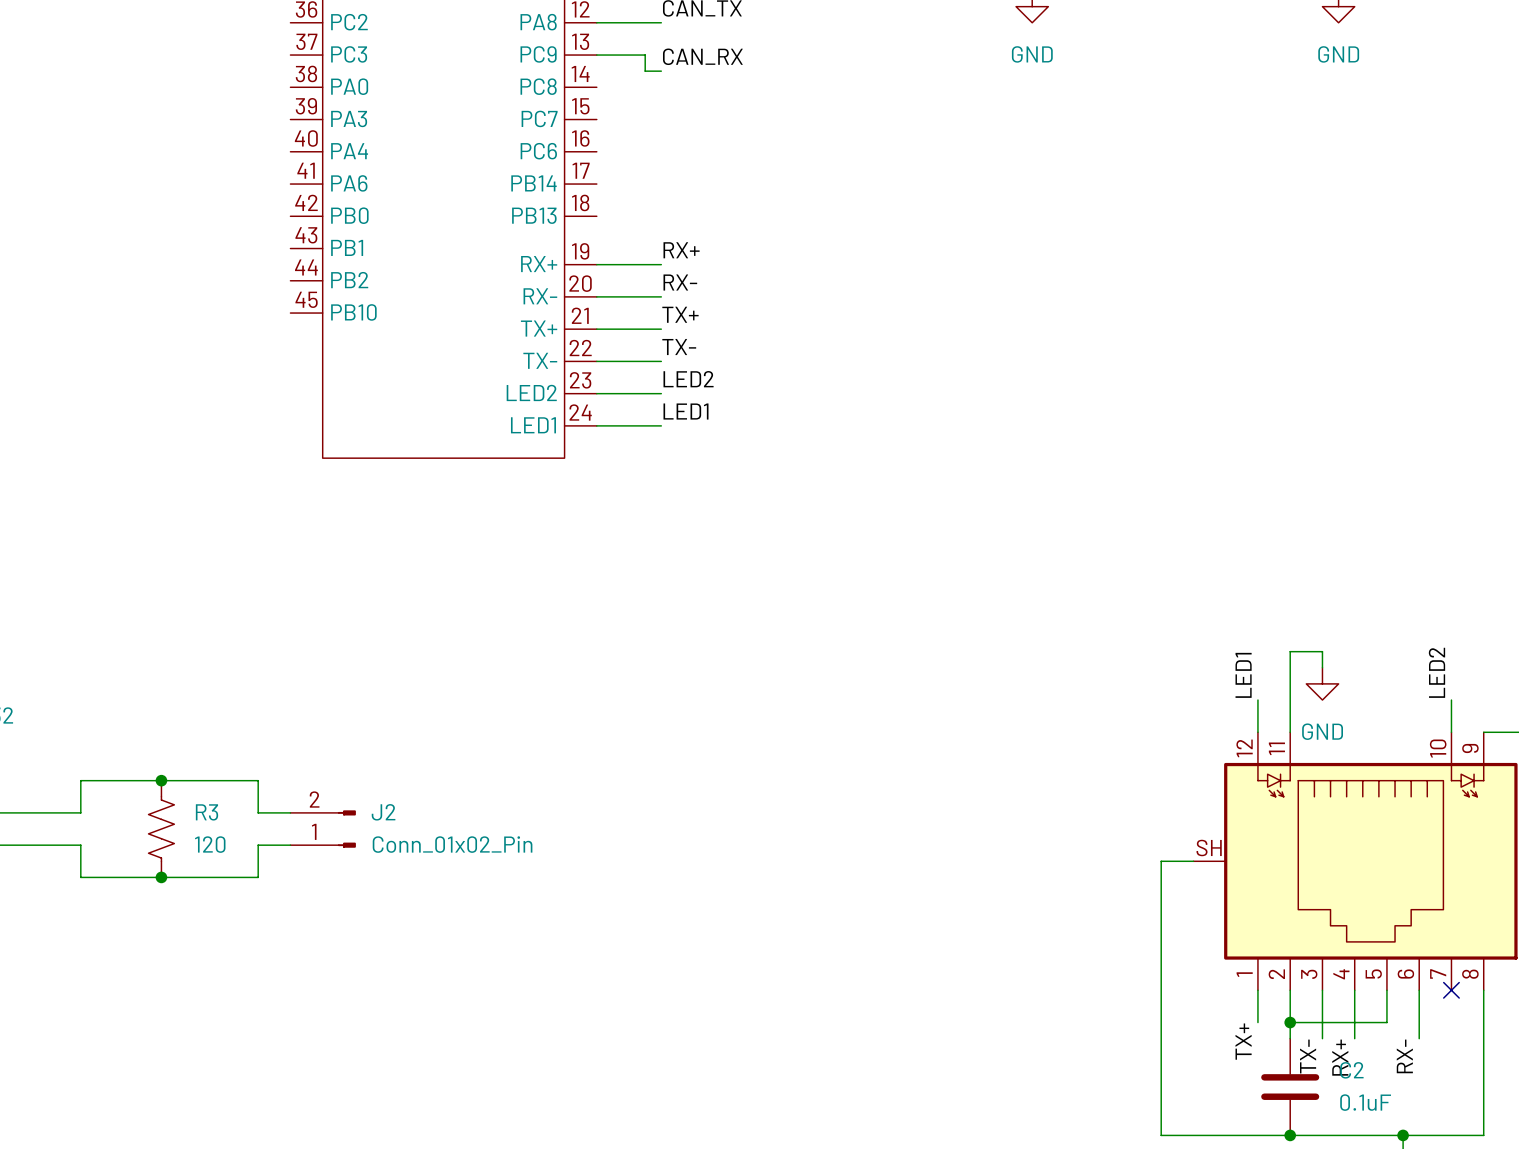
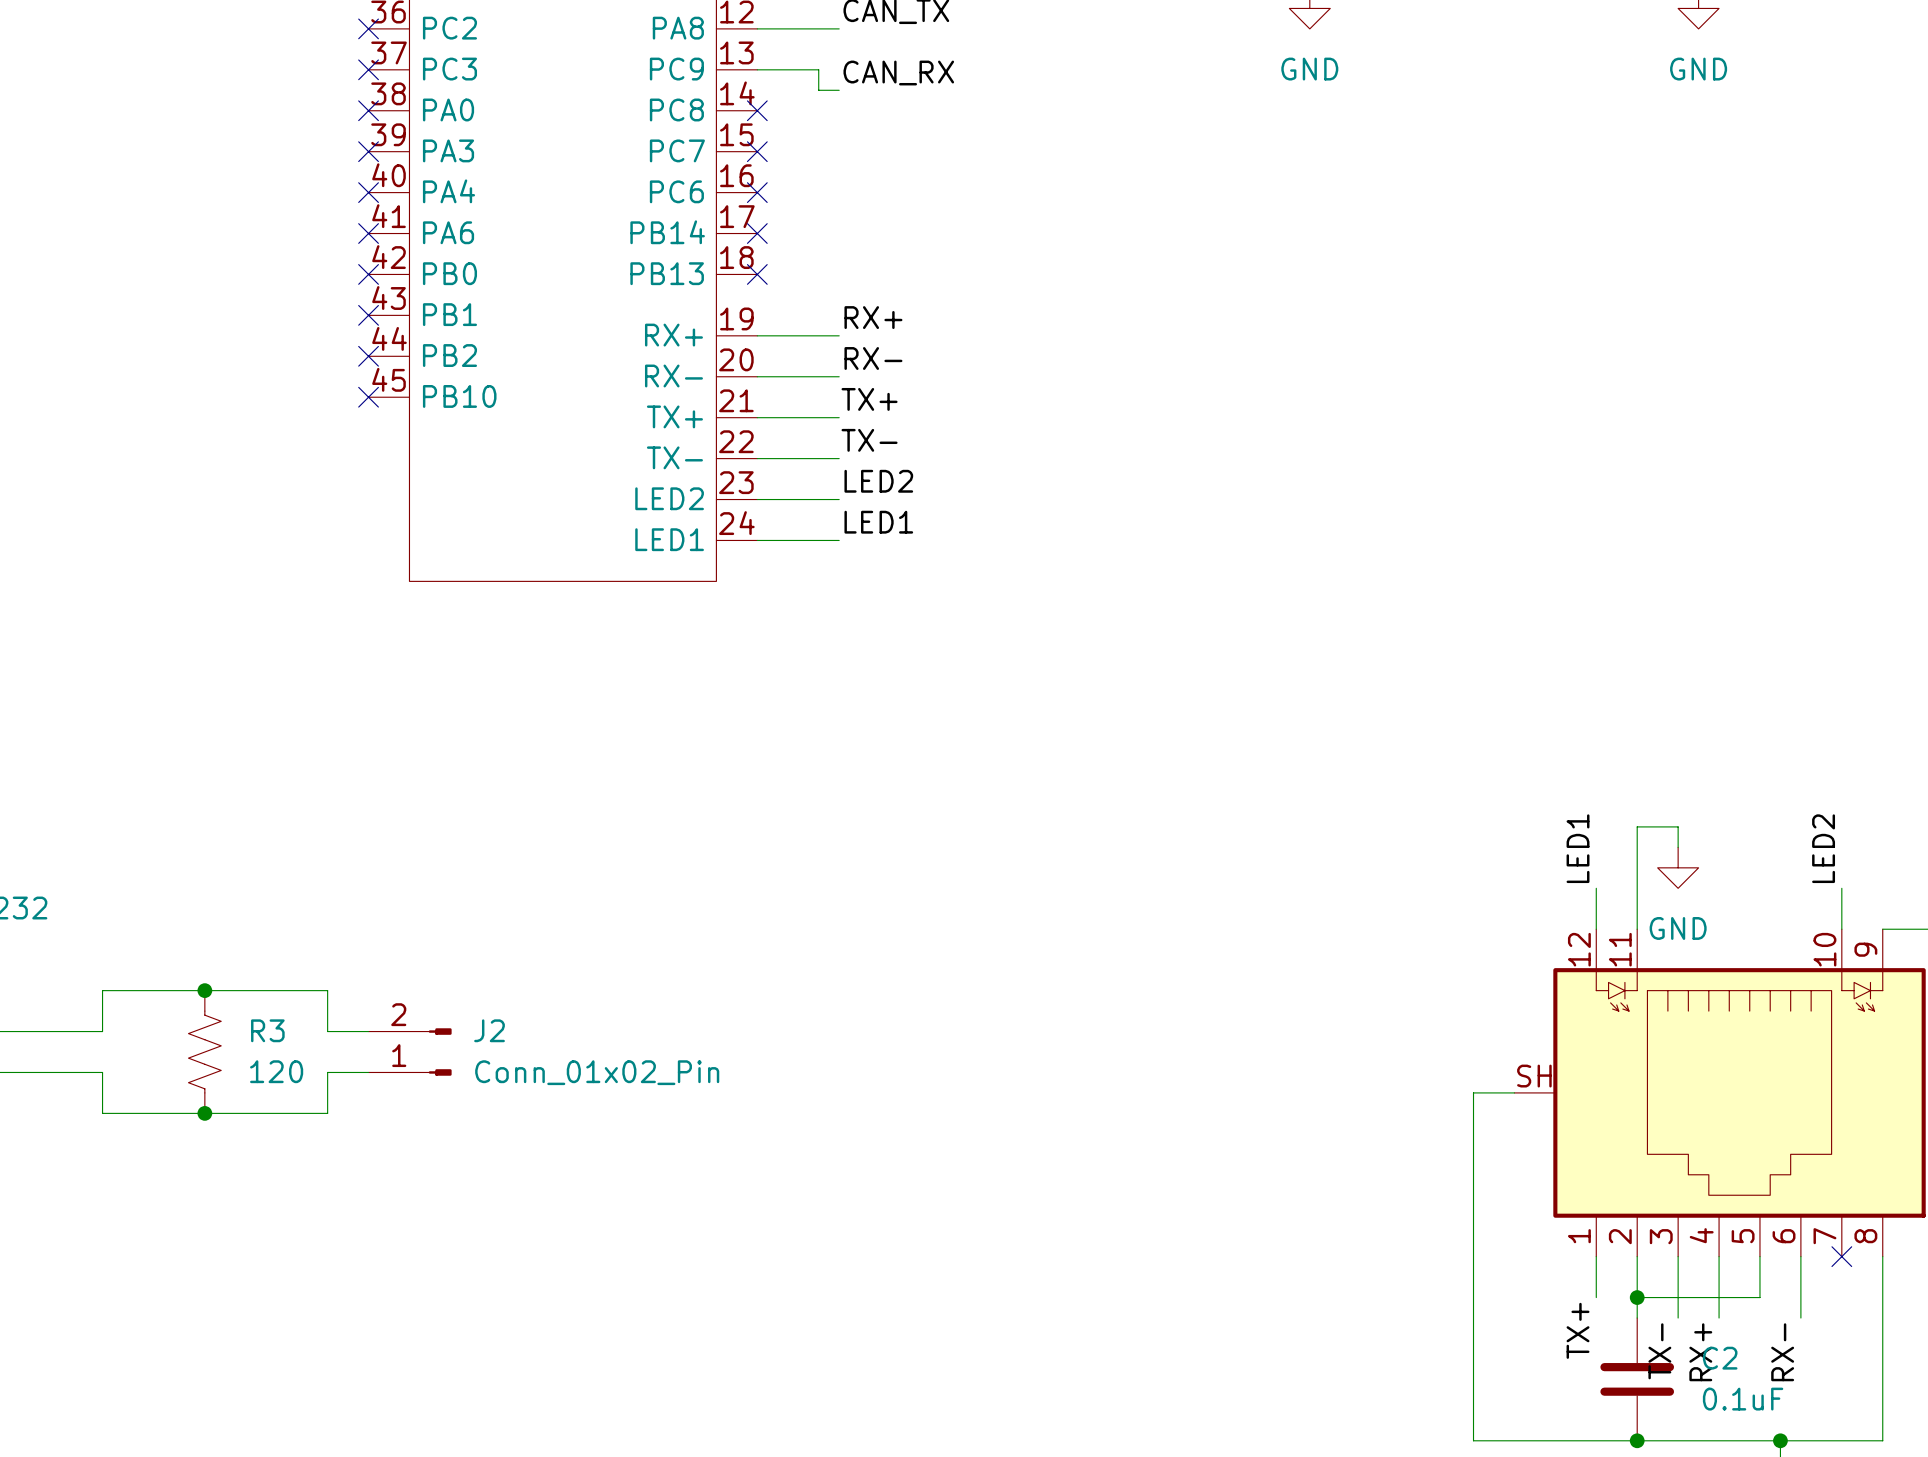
no-connect mark: none -> (368, 28)
no-connect mark: none -> (368, 69)
no-connect mark: none -> (368, 110)
no-connect mark: none -> (757, 110)
no-connect mark: none -> (368, 151)
no-connect mark: none -> (757, 151)
no-connect mark: none -> (368, 192)
no-connect mark: none -> (757, 192)
no-connect mark: none -> (368, 233)
no-connect mark: none -> (757, 233)
no-connect mark: none -> (368, 274)
no-connect mark: none -> (757, 274)
no-connect mark: none -> (368, 315)
no-connect mark: none -> (368, 356)
no-connect mark: none -> (368, 397)

